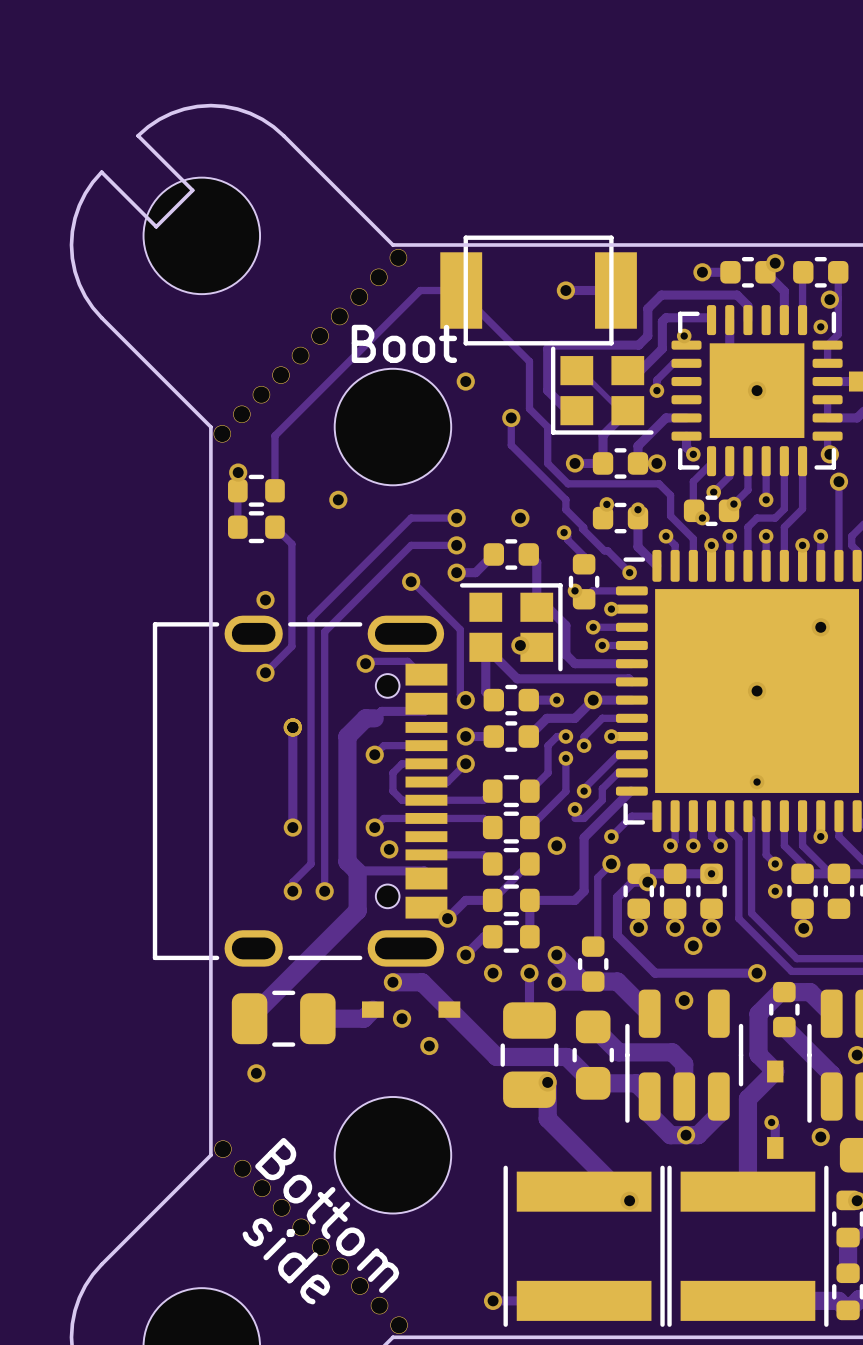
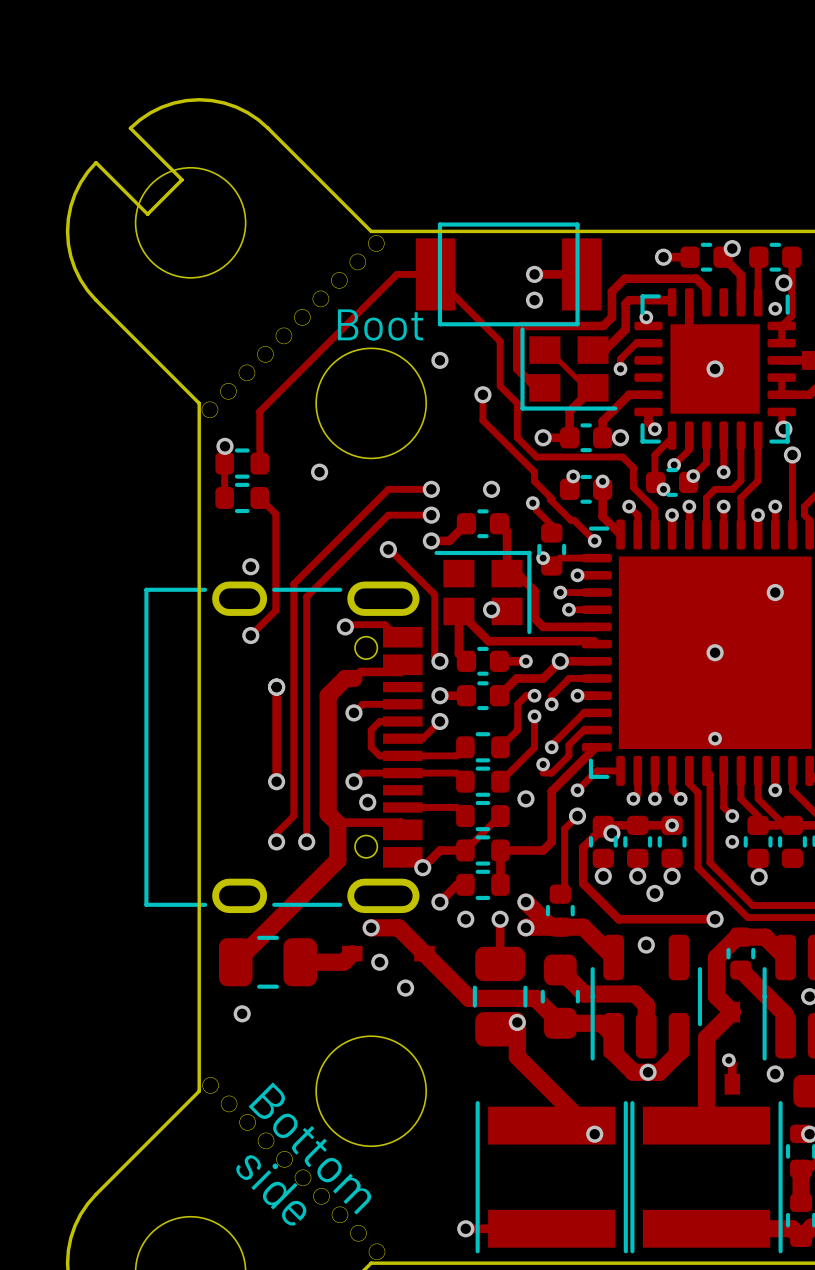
via: none -> (534, 300)

